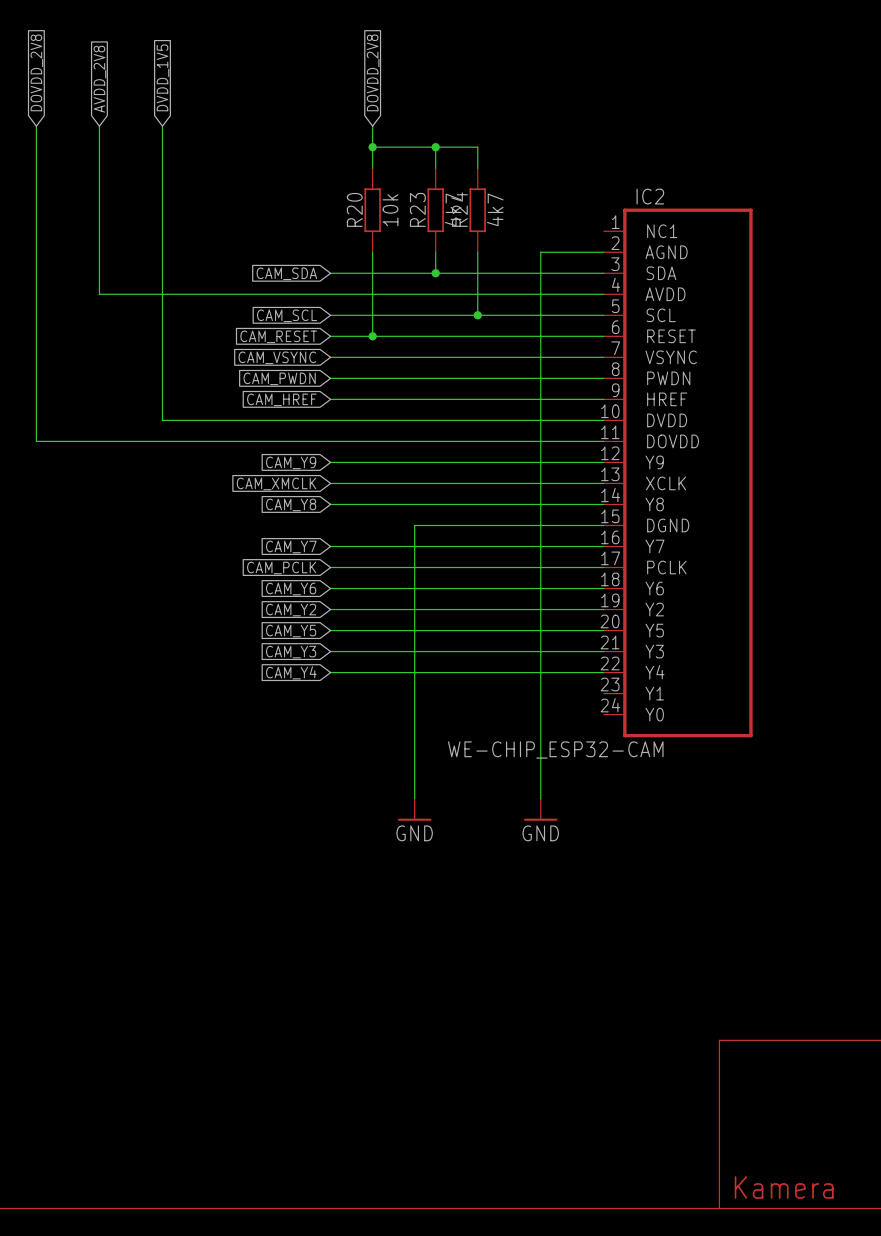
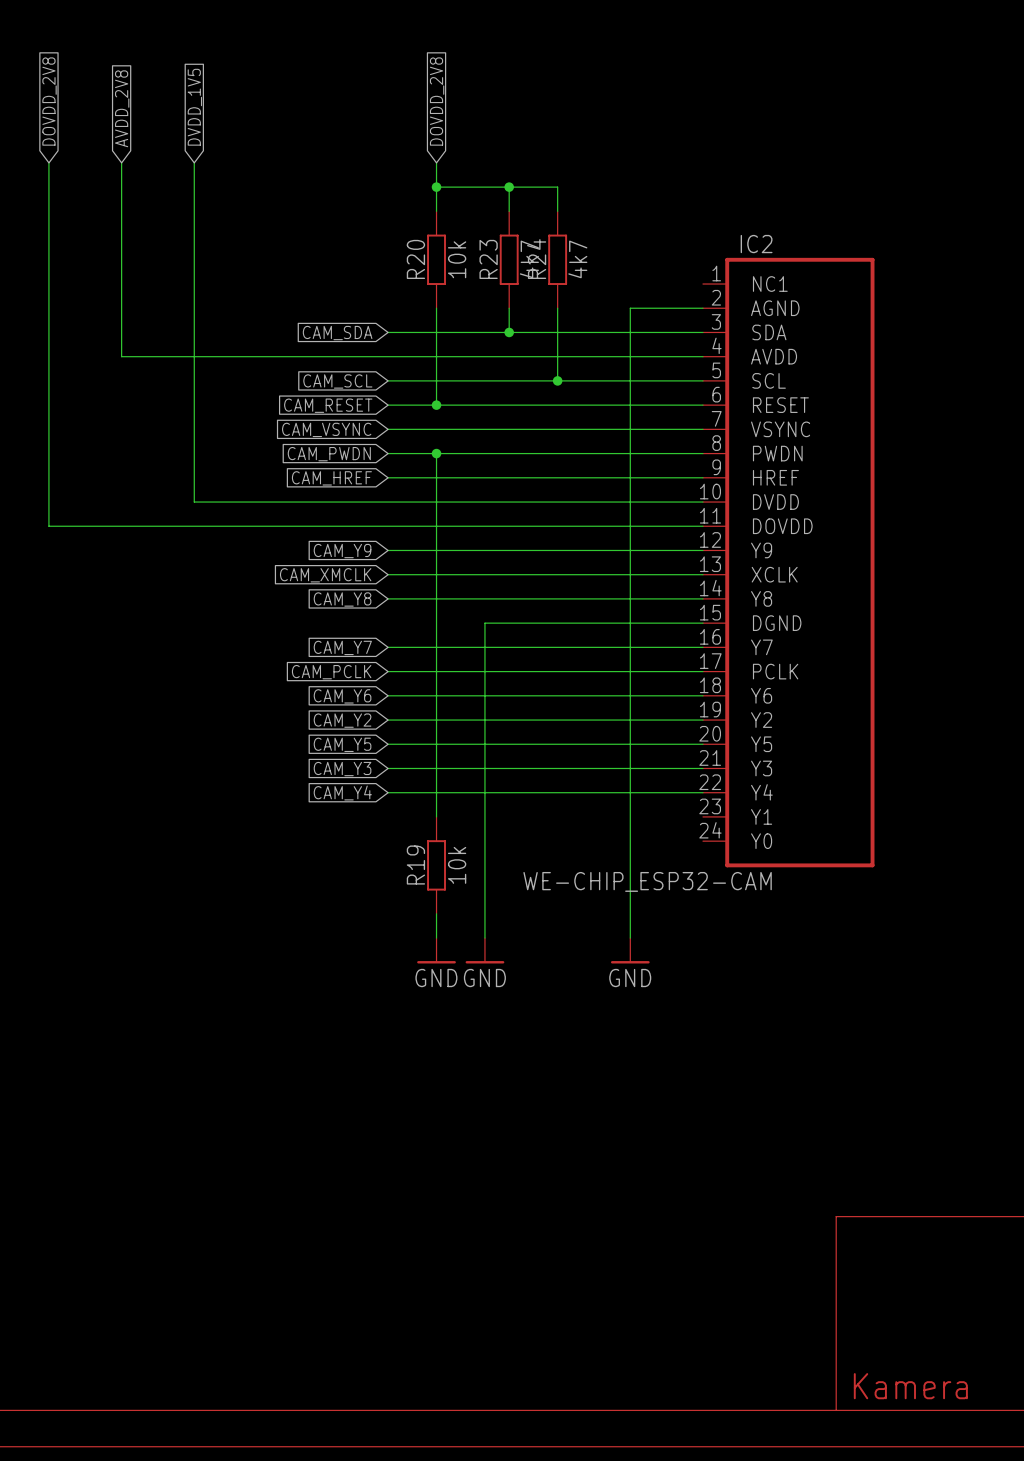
wire: none -> (436, 453) (436, 816)
junction: none -> (436, 453)
R19: none -> 10k (436, 865)
wire: none -> (436, 913) (436, 938)
power symbol: none -> GND (436, 950)

